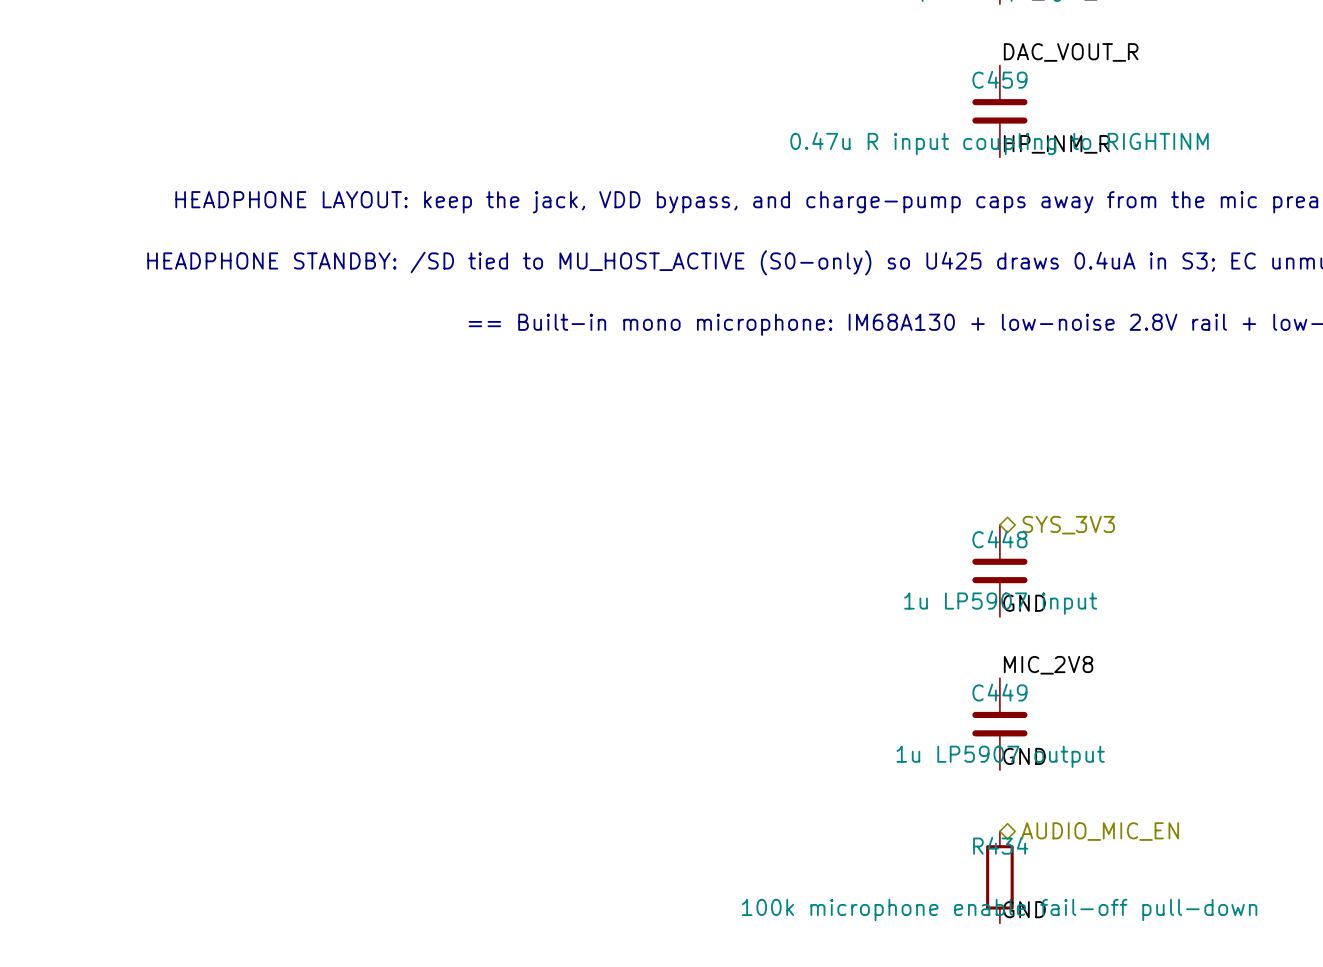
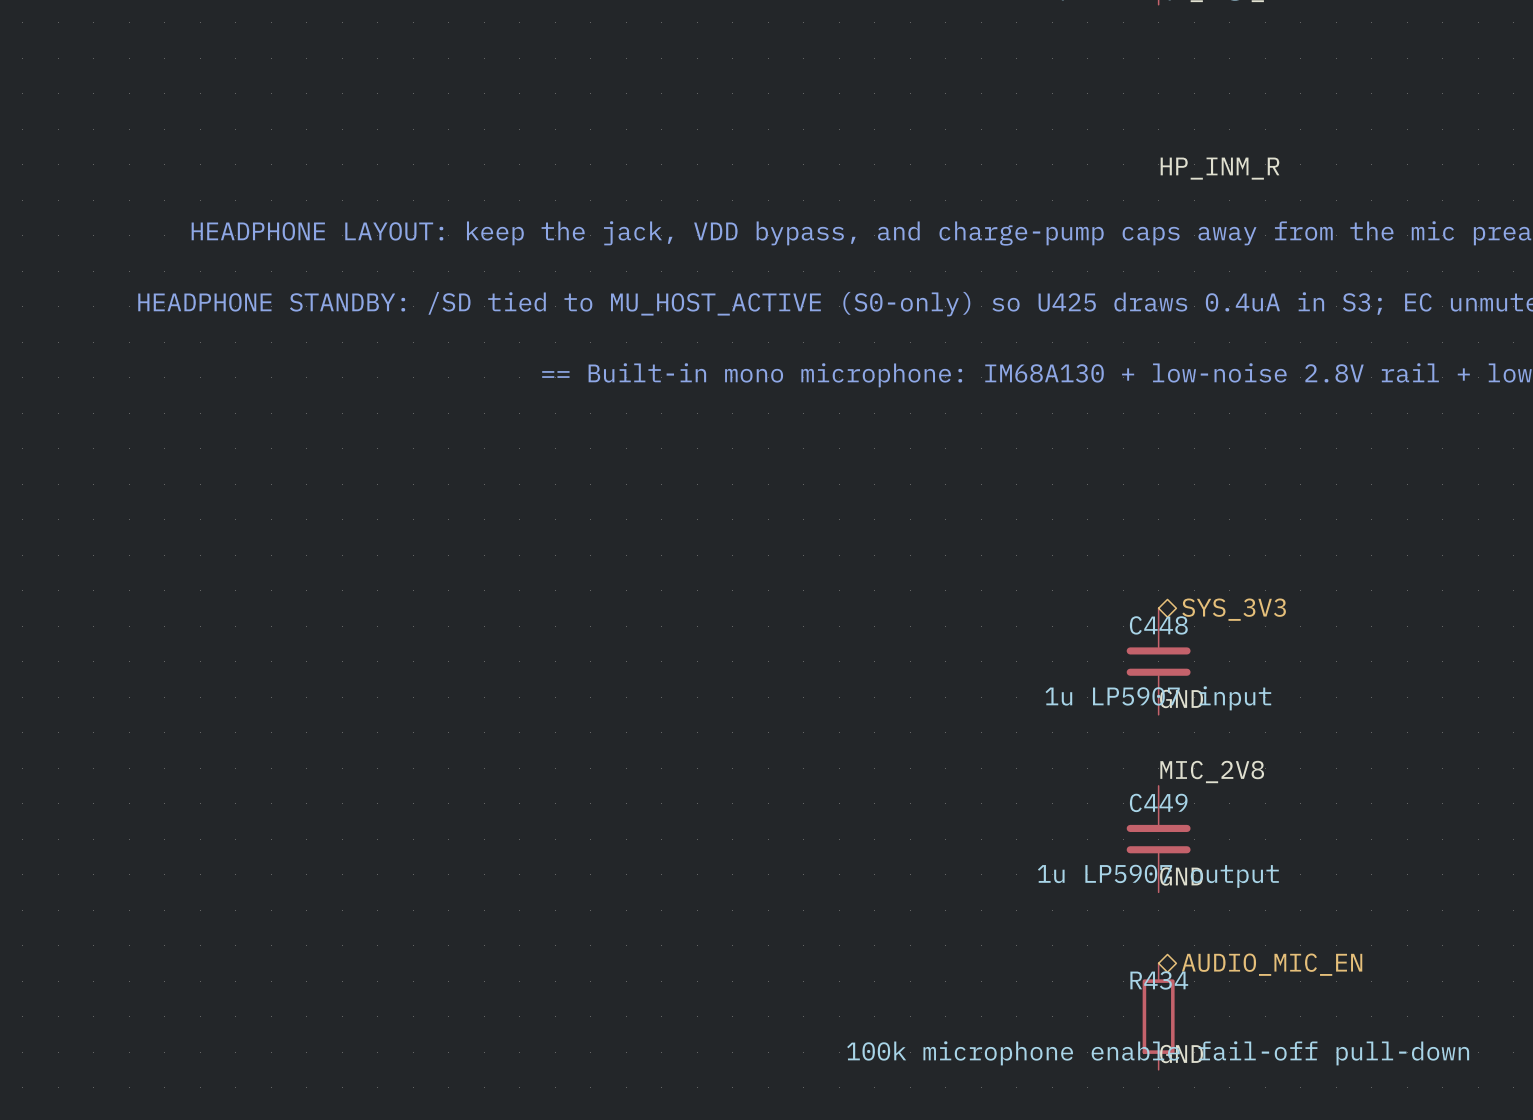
label: DAC_VOUT_R (1071, 52) -> none
C459: 0.47u R input coupling to RIGHTINM (999, 111) -> none

